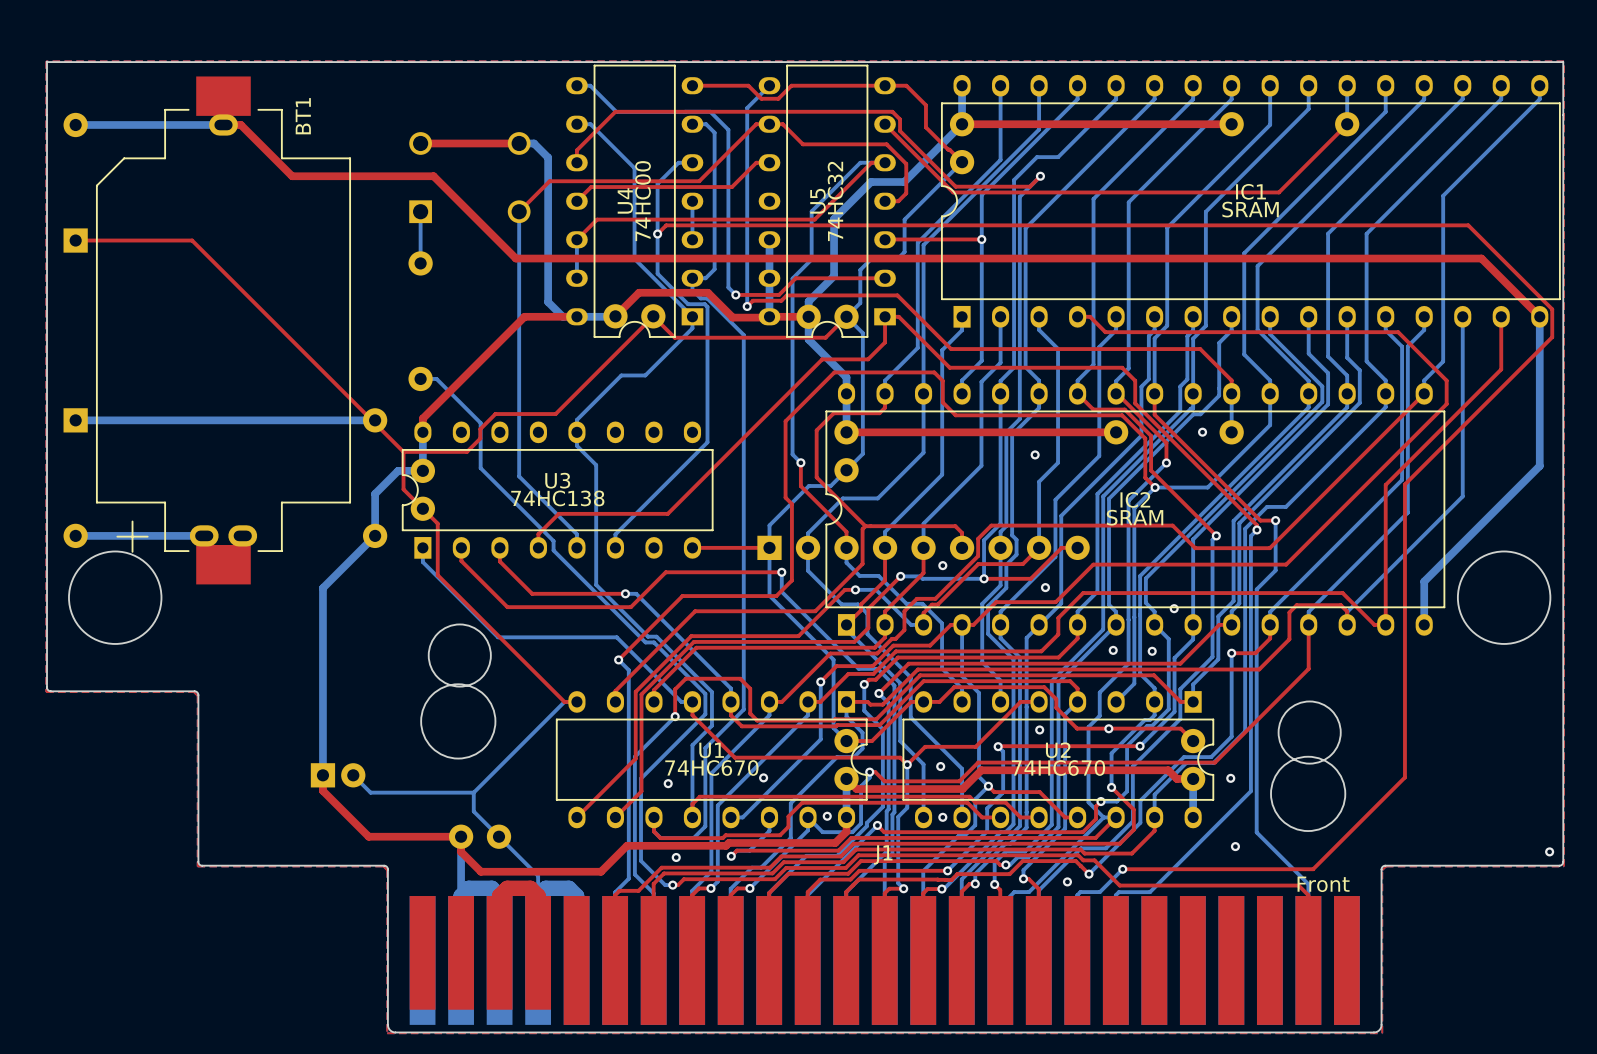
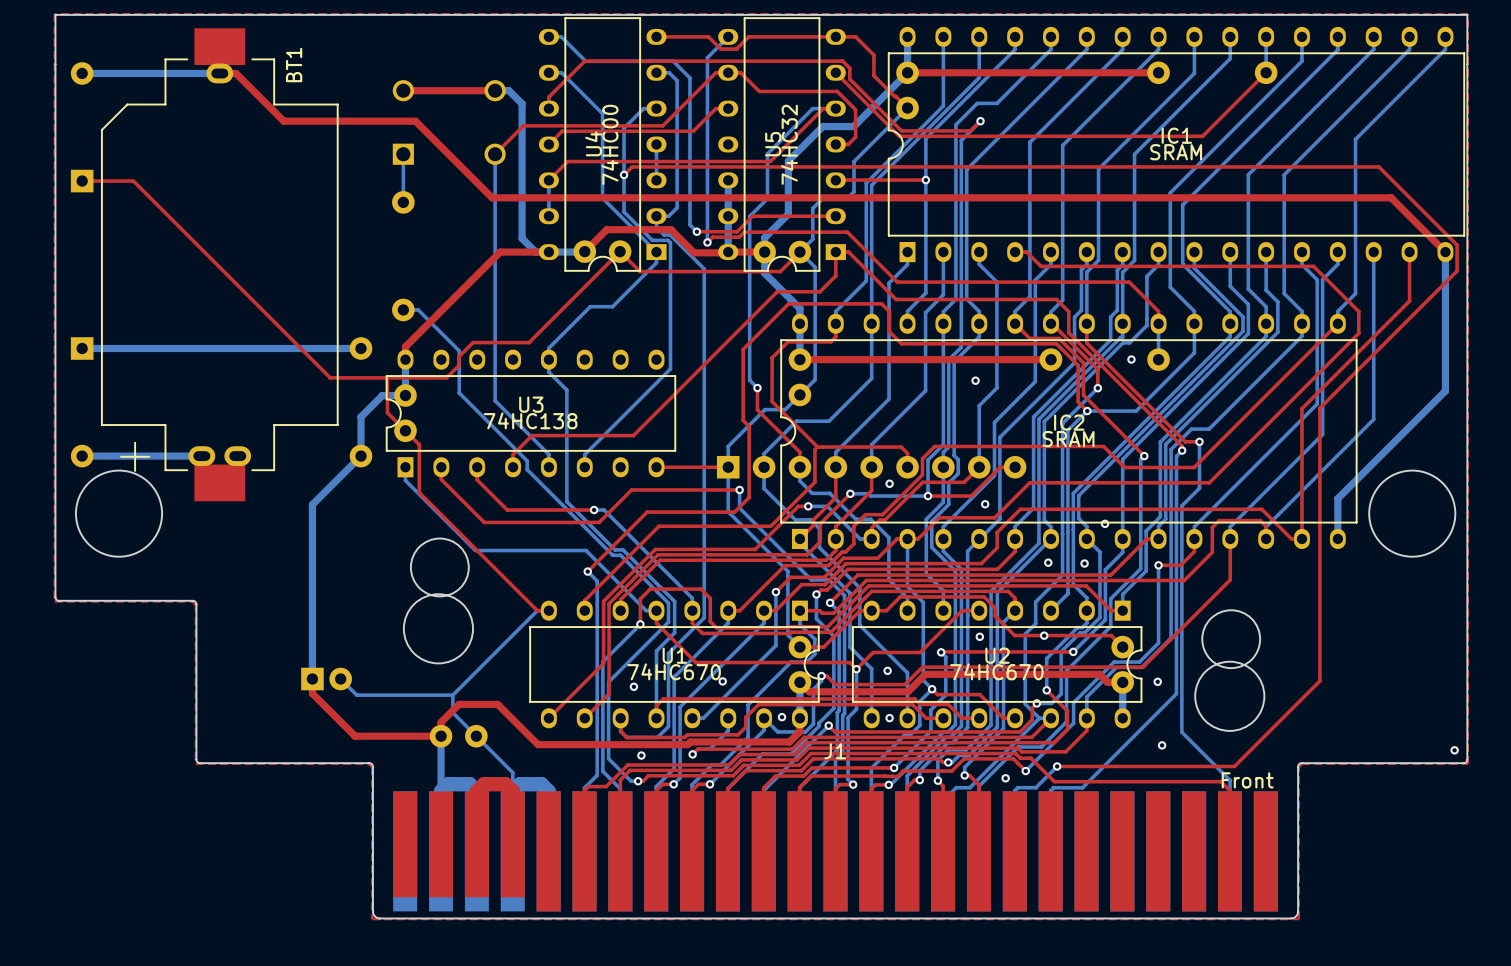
top track: (130, 240) (192, 240) (403, 451) -> (133, 181) (330, 377) (387, 377)
top track: (461, 836) (461, 851) (480, 871) (601, 871) (626, 845) -> (441, 736) (441, 722) (458, 704) (497, 704) (538, 744) (595, 744)

